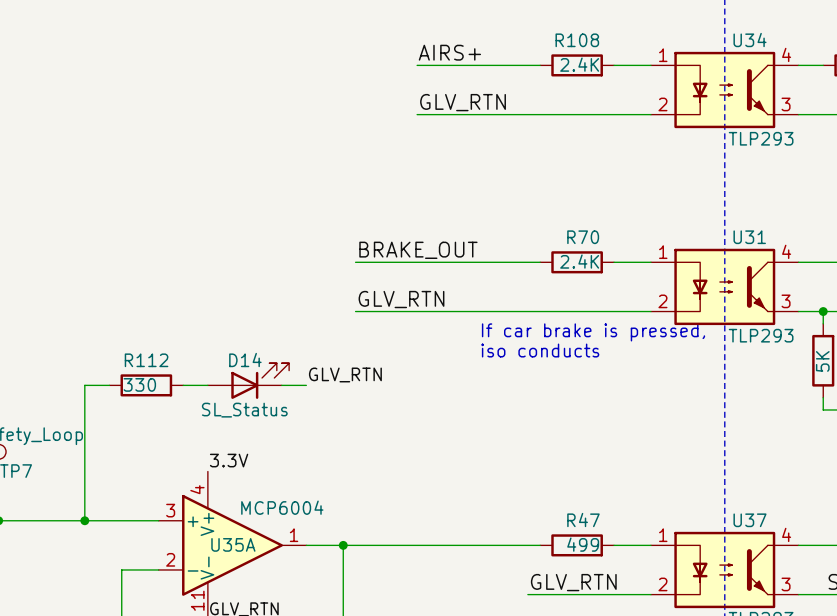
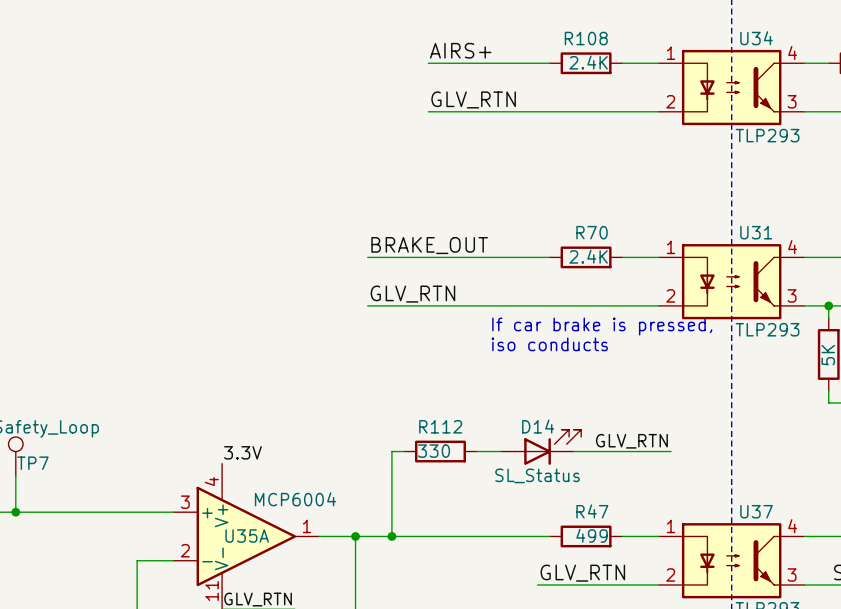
label: GLV_RTN (345, 374) -> none
D14 position: (248, 381) -> (541, 447)
wire: (109, 385) (84, 385) (84, 520) -> none
R112 position: (146, 385) -> (440, 451)
wire: (183, 385) (207, 385) -> none
wire: (281, 385) (306, 385) -> (476, 451) (501, 451)
label: none -> GLV_RTN (631, 441)
wire: none -> (404, 451) (391, 451) (391, 536)
wire: none -> (573, 451) (671, 451)
junction: (84, 520) -> none
junction: none -> (391, 536)

